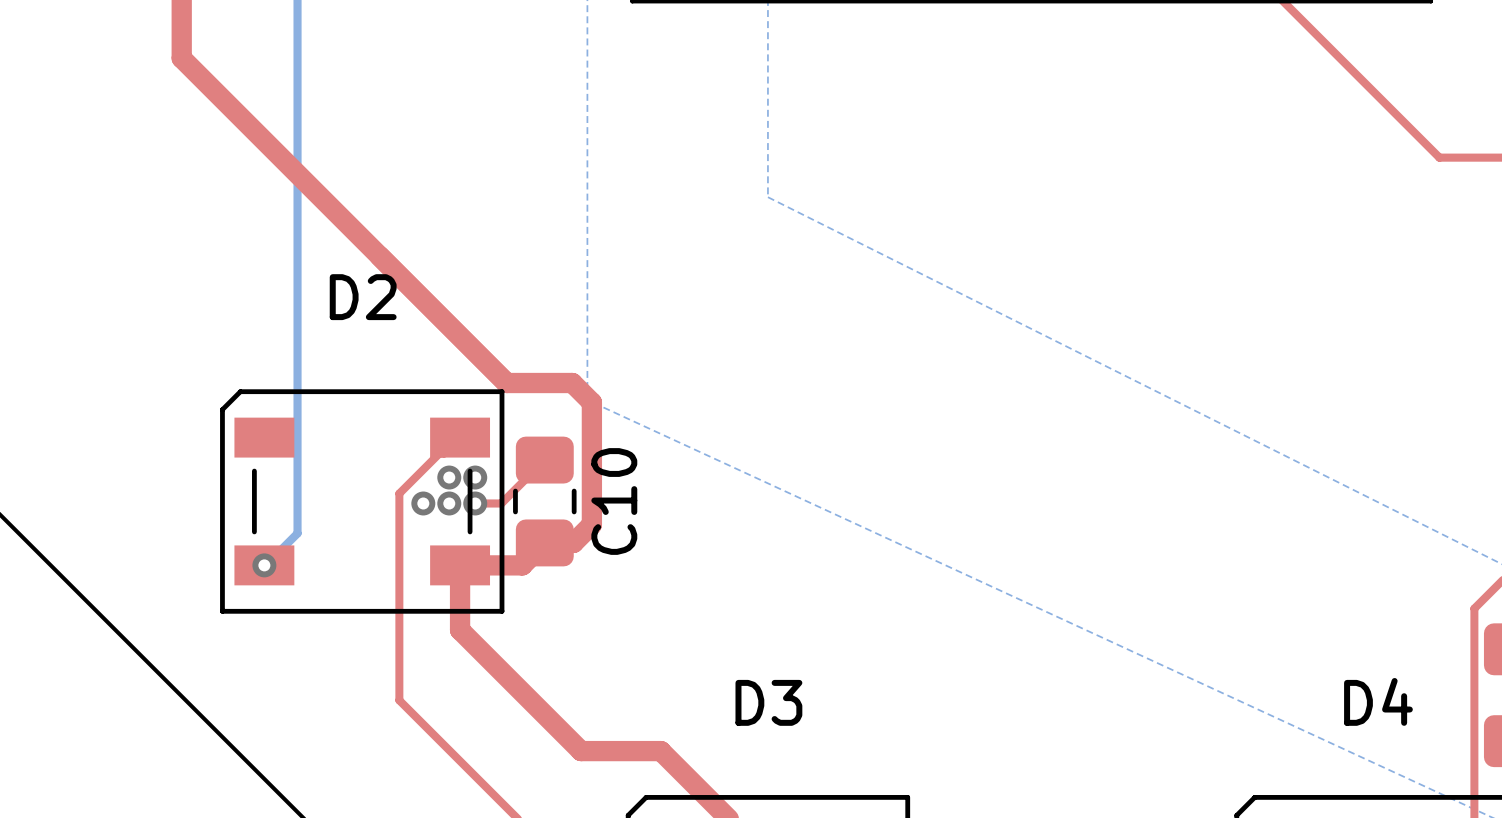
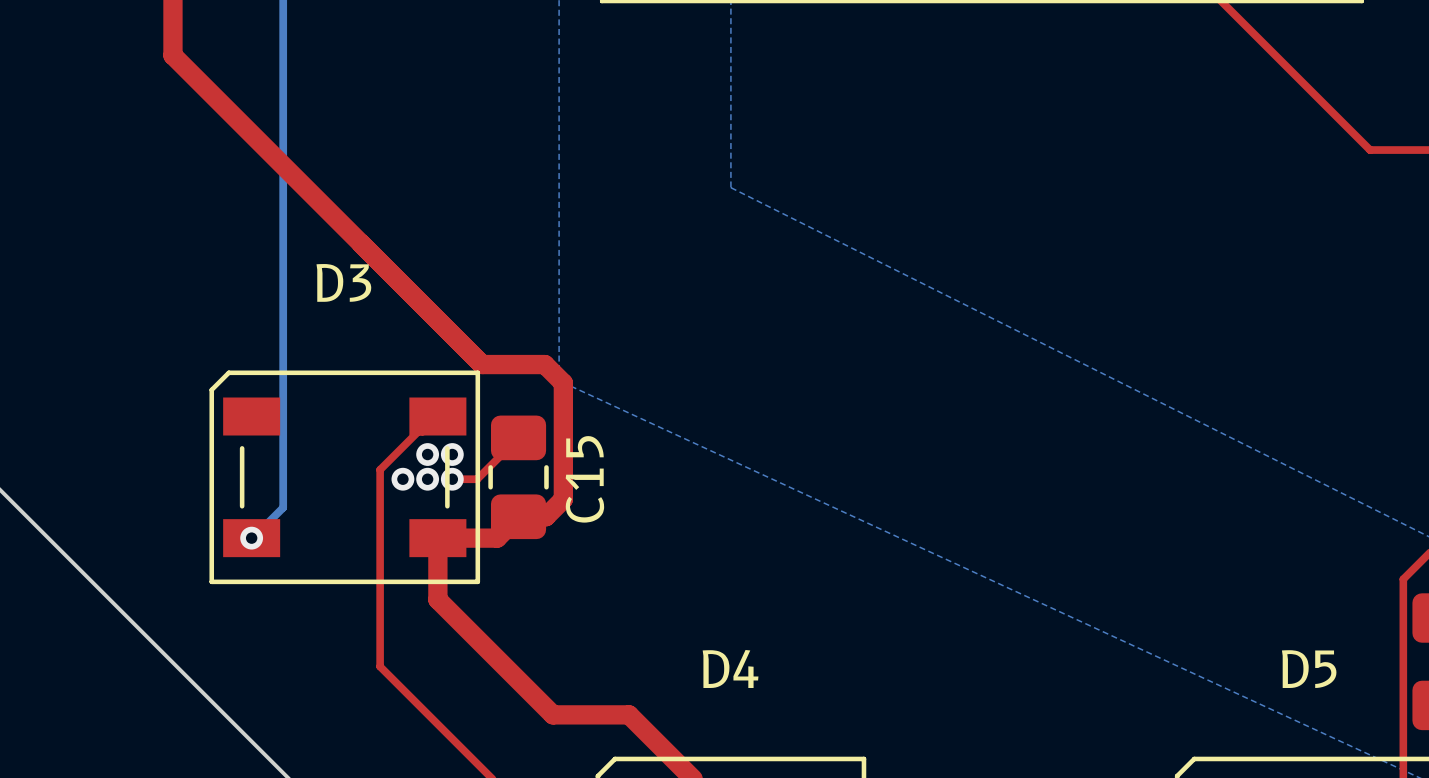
D2 name: D2 (363, 297) -> D3 (343, 282)
C10 name: C10 (614, 501) -> C15 (584, 479)
D4 name: D4 (1378, 701) -> D5 (1309, 669)
D3 name: D3 (768, 702) -> D4 (730, 668)

